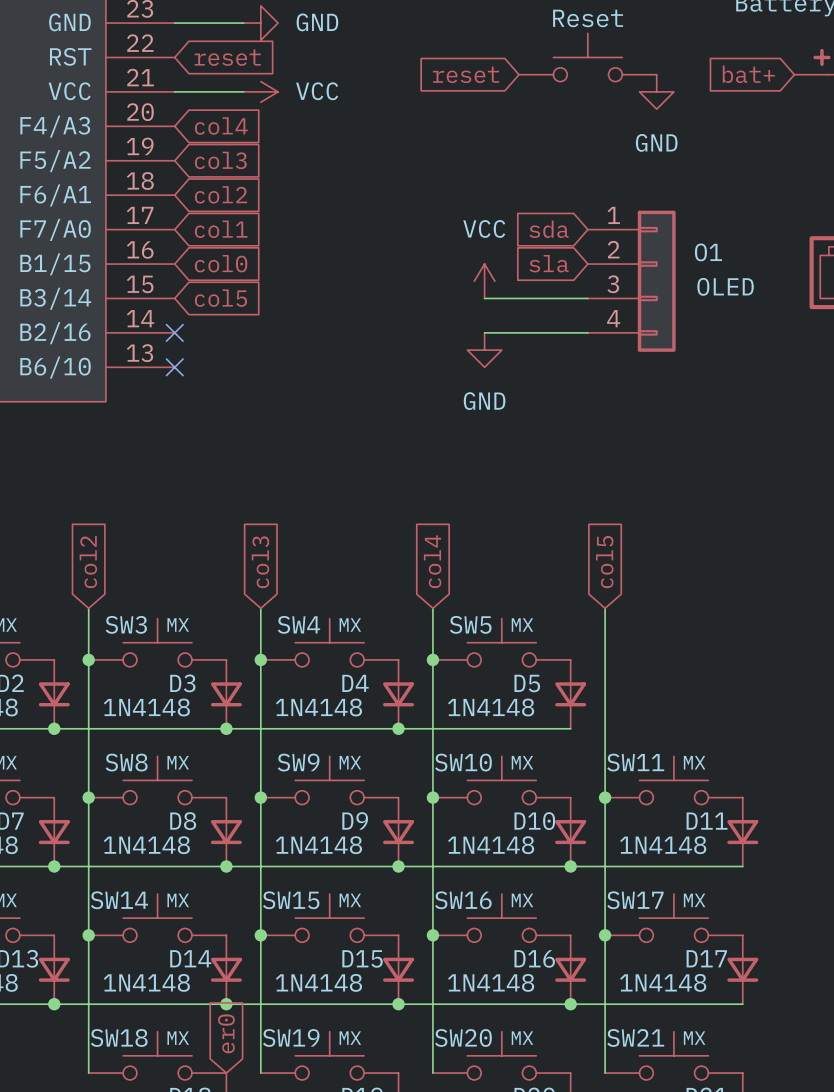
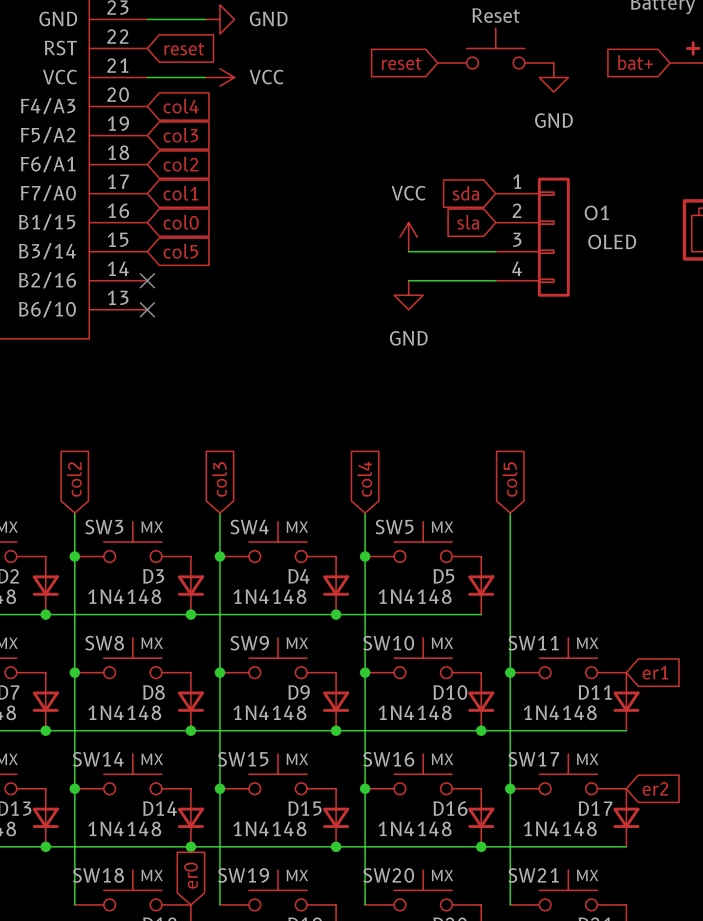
global label: none -> er1 (655, 672)
global label: none -> er2 (655, 788)

